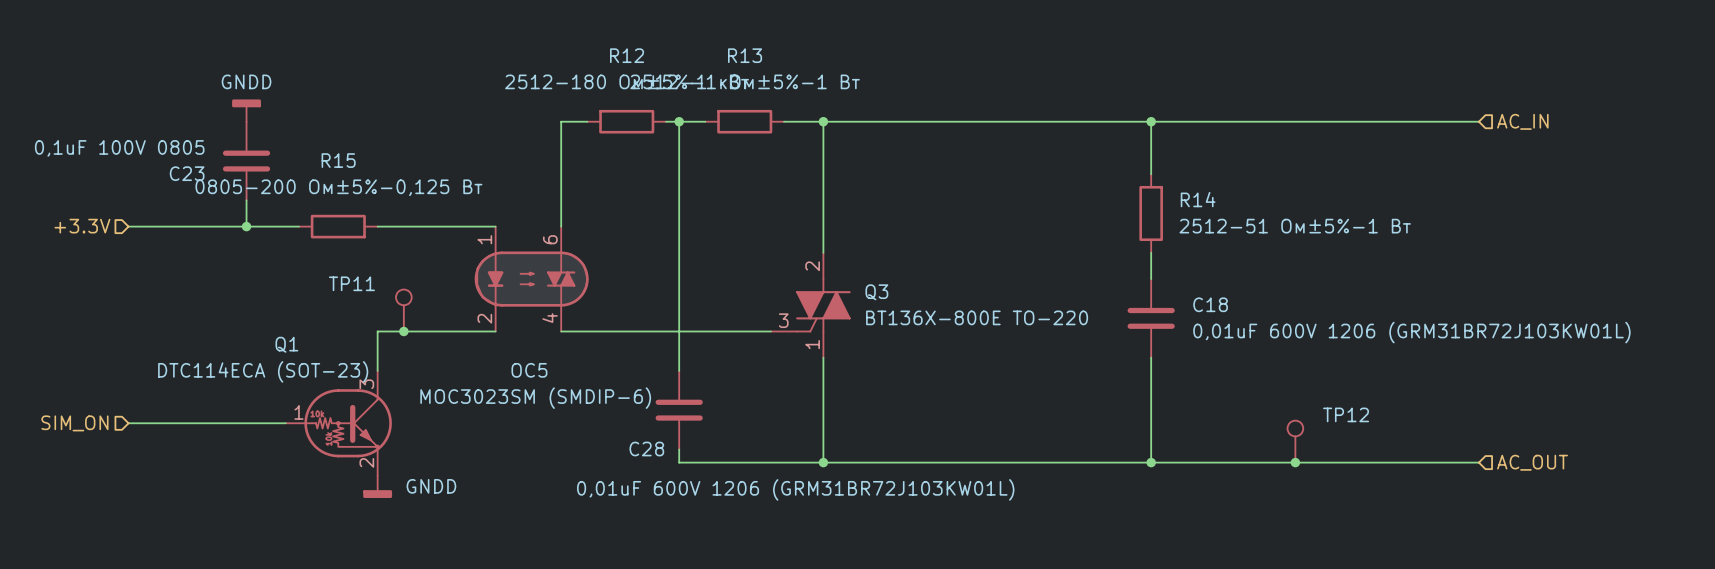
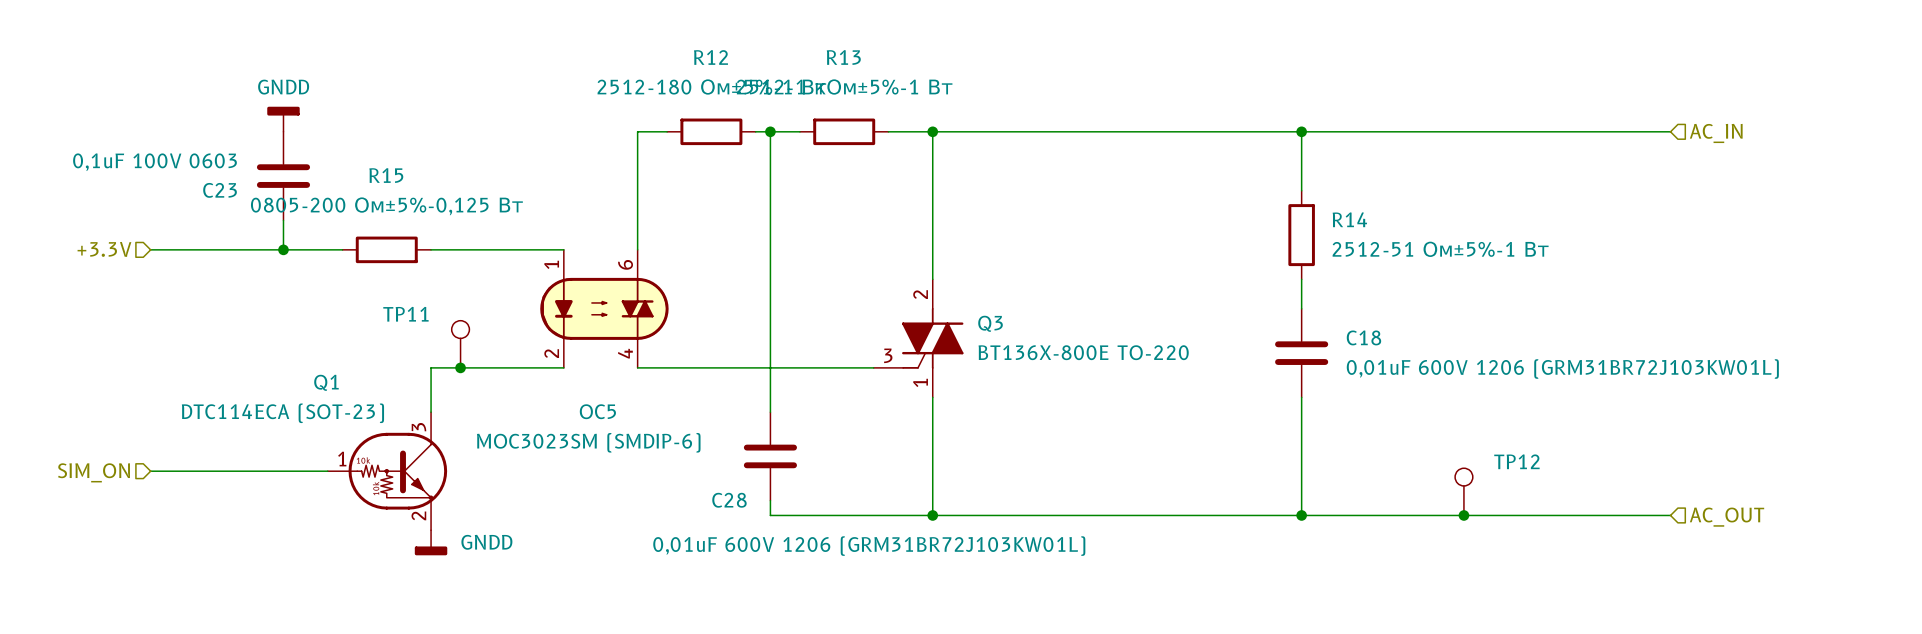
C23 value: 0,1uF 100V 0805 (119, 148) -> 0,1uF 100V 0603 (154, 162)

